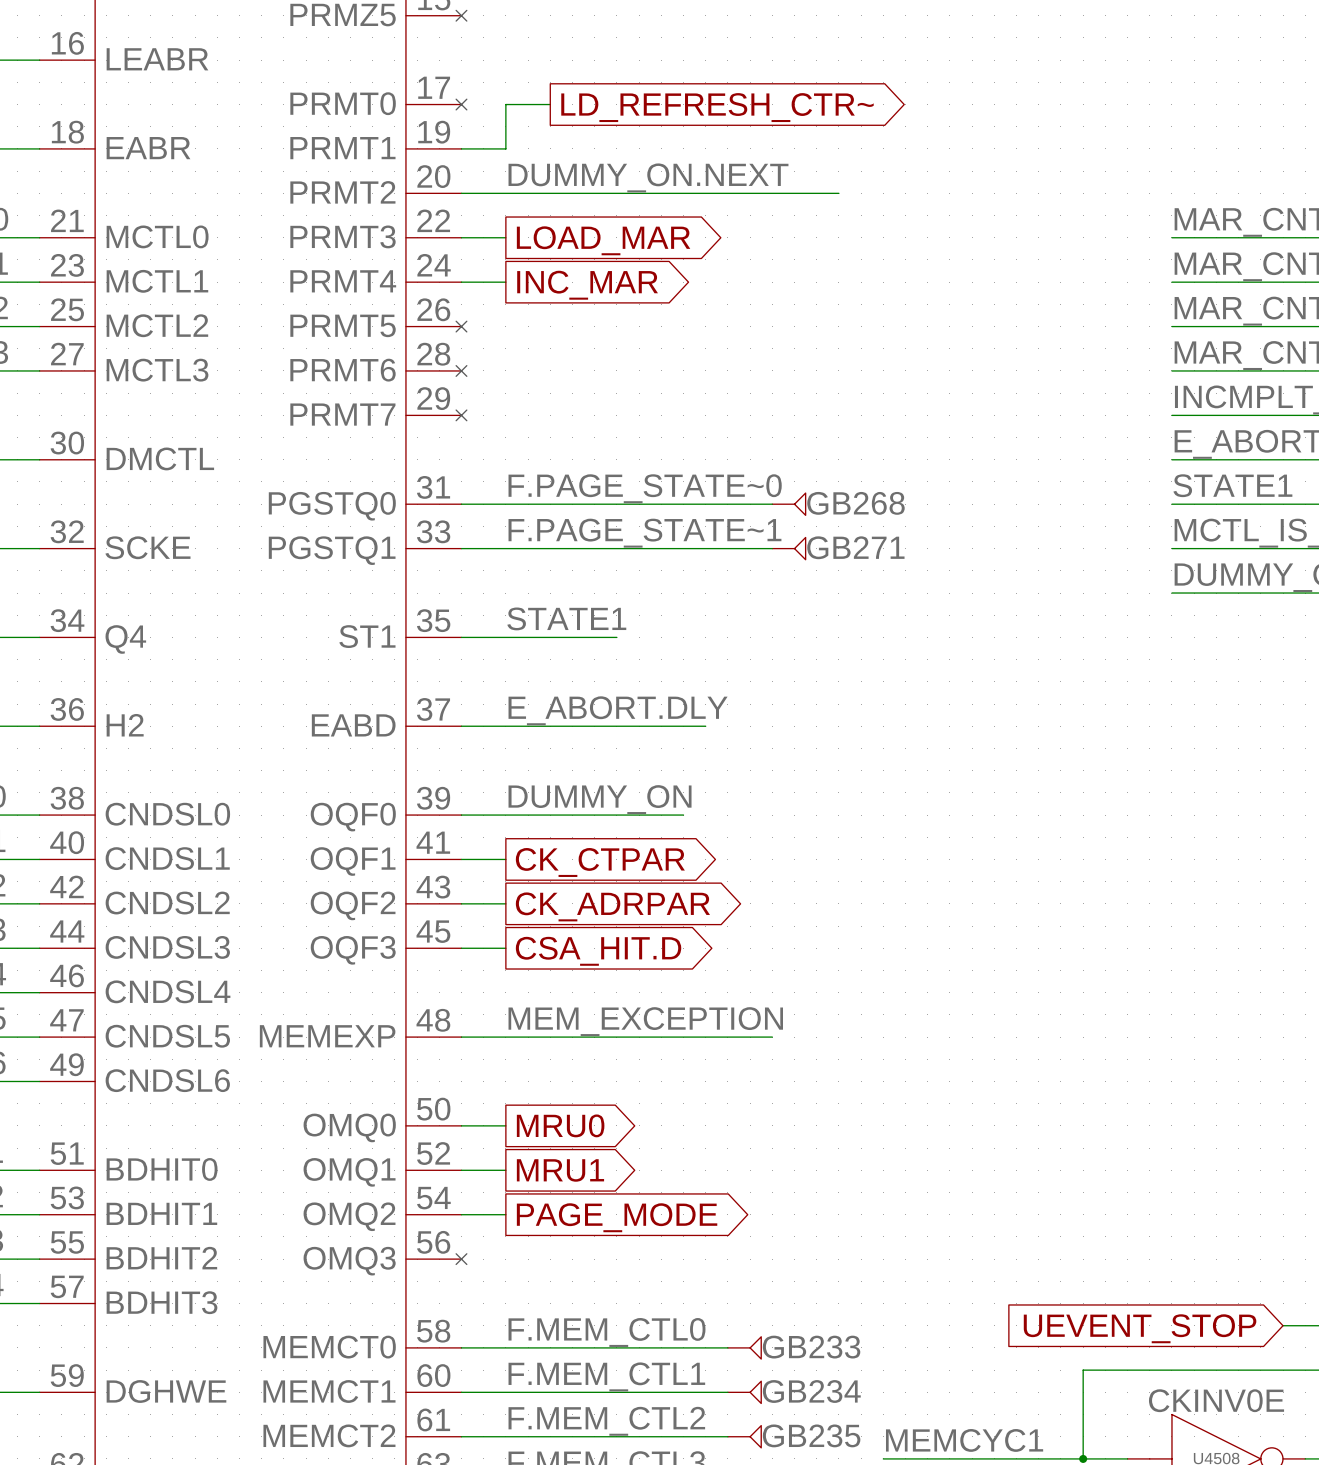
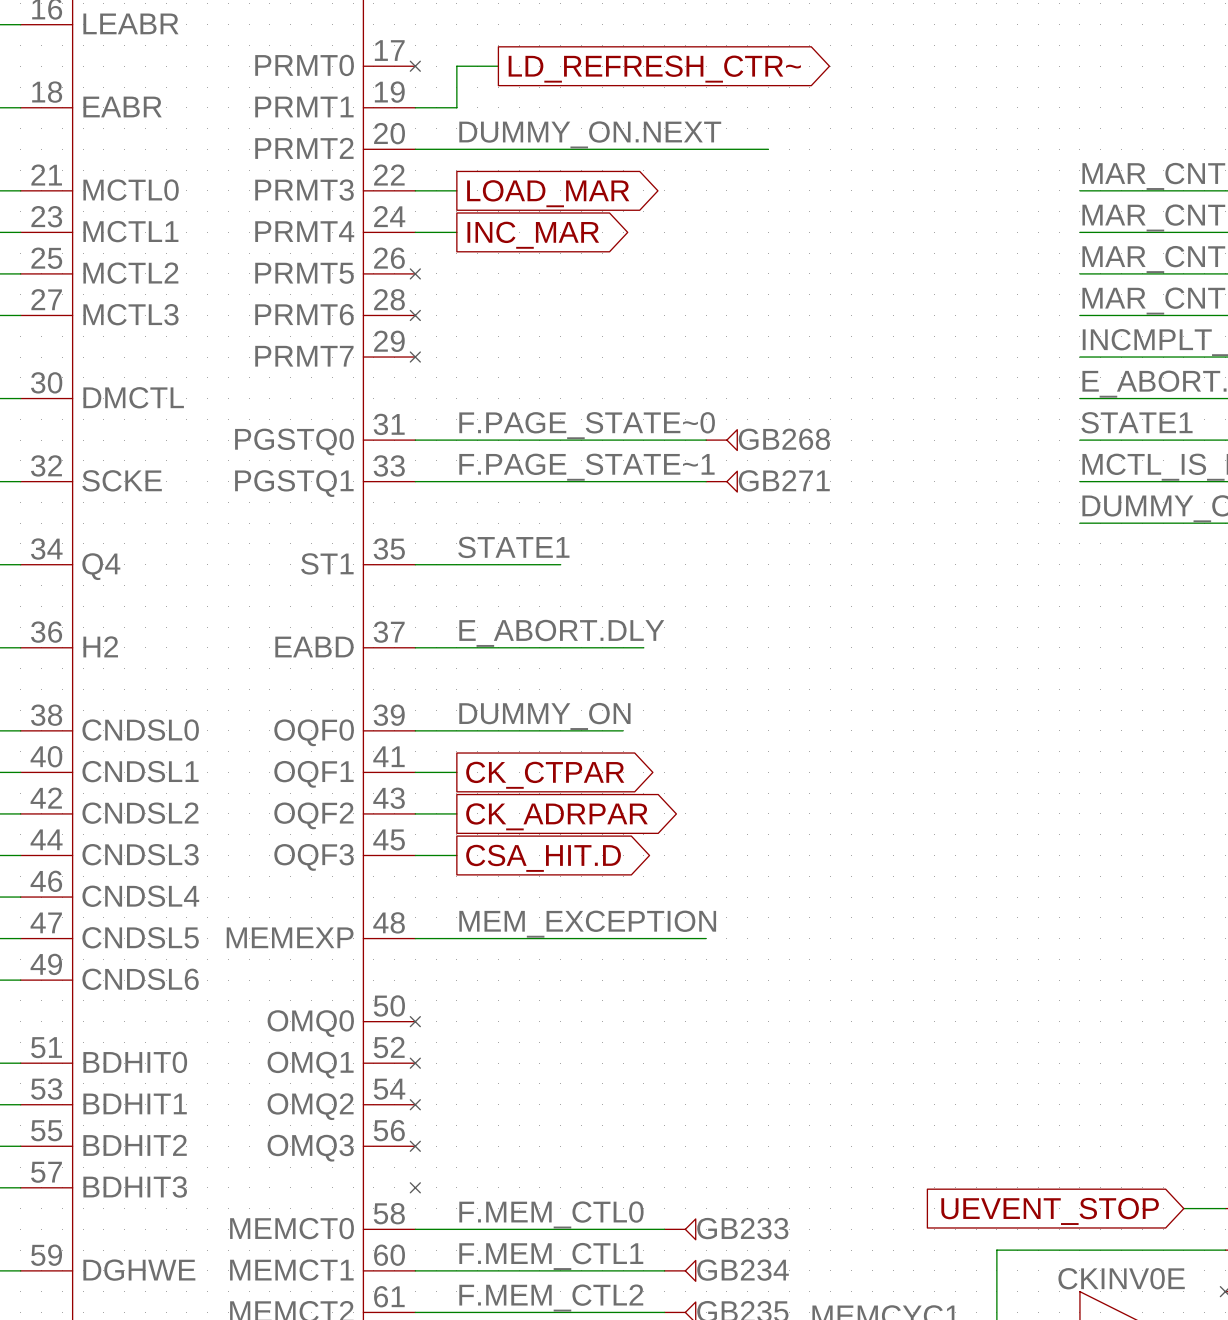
wire: (461, 1125) (505, 1125) -> none
no-connect mark: none -> (415, 1021)
global label: MRU0 (560, 1125) -> none
wire: (461, 1170) (505, 1170) -> none
no-connect mark: none -> (415, 1063)
global label: MRU1 (560, 1170) -> none
wire: (461, 1214) (505, 1214) -> none
no-connect mark: none -> (415, 1104)
global label: PAGE_MODE (617, 1217) -> none
no-connect mark: none -> (415, 1187)

